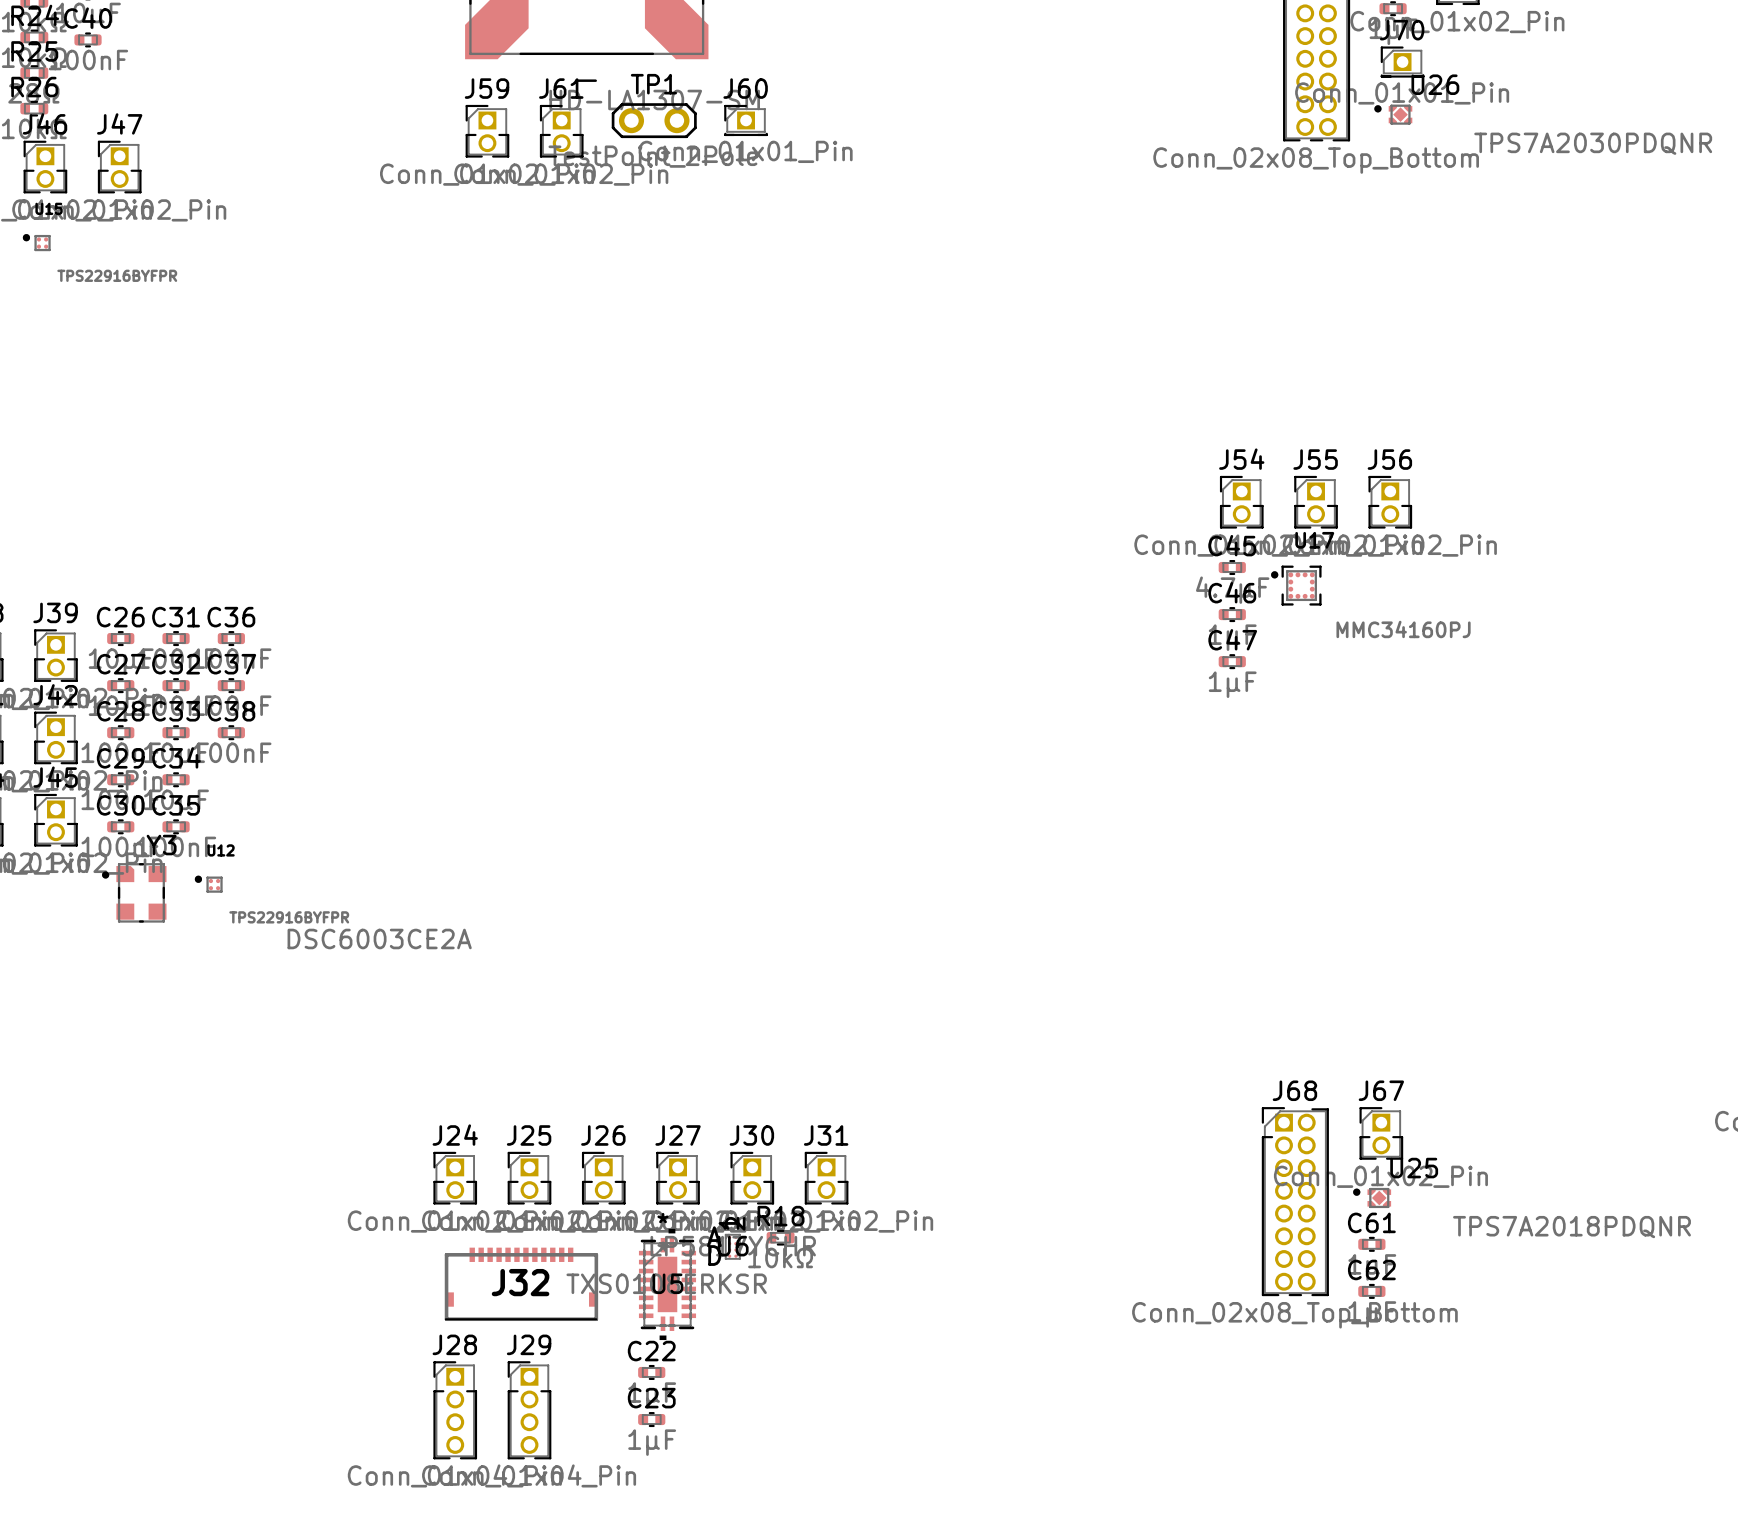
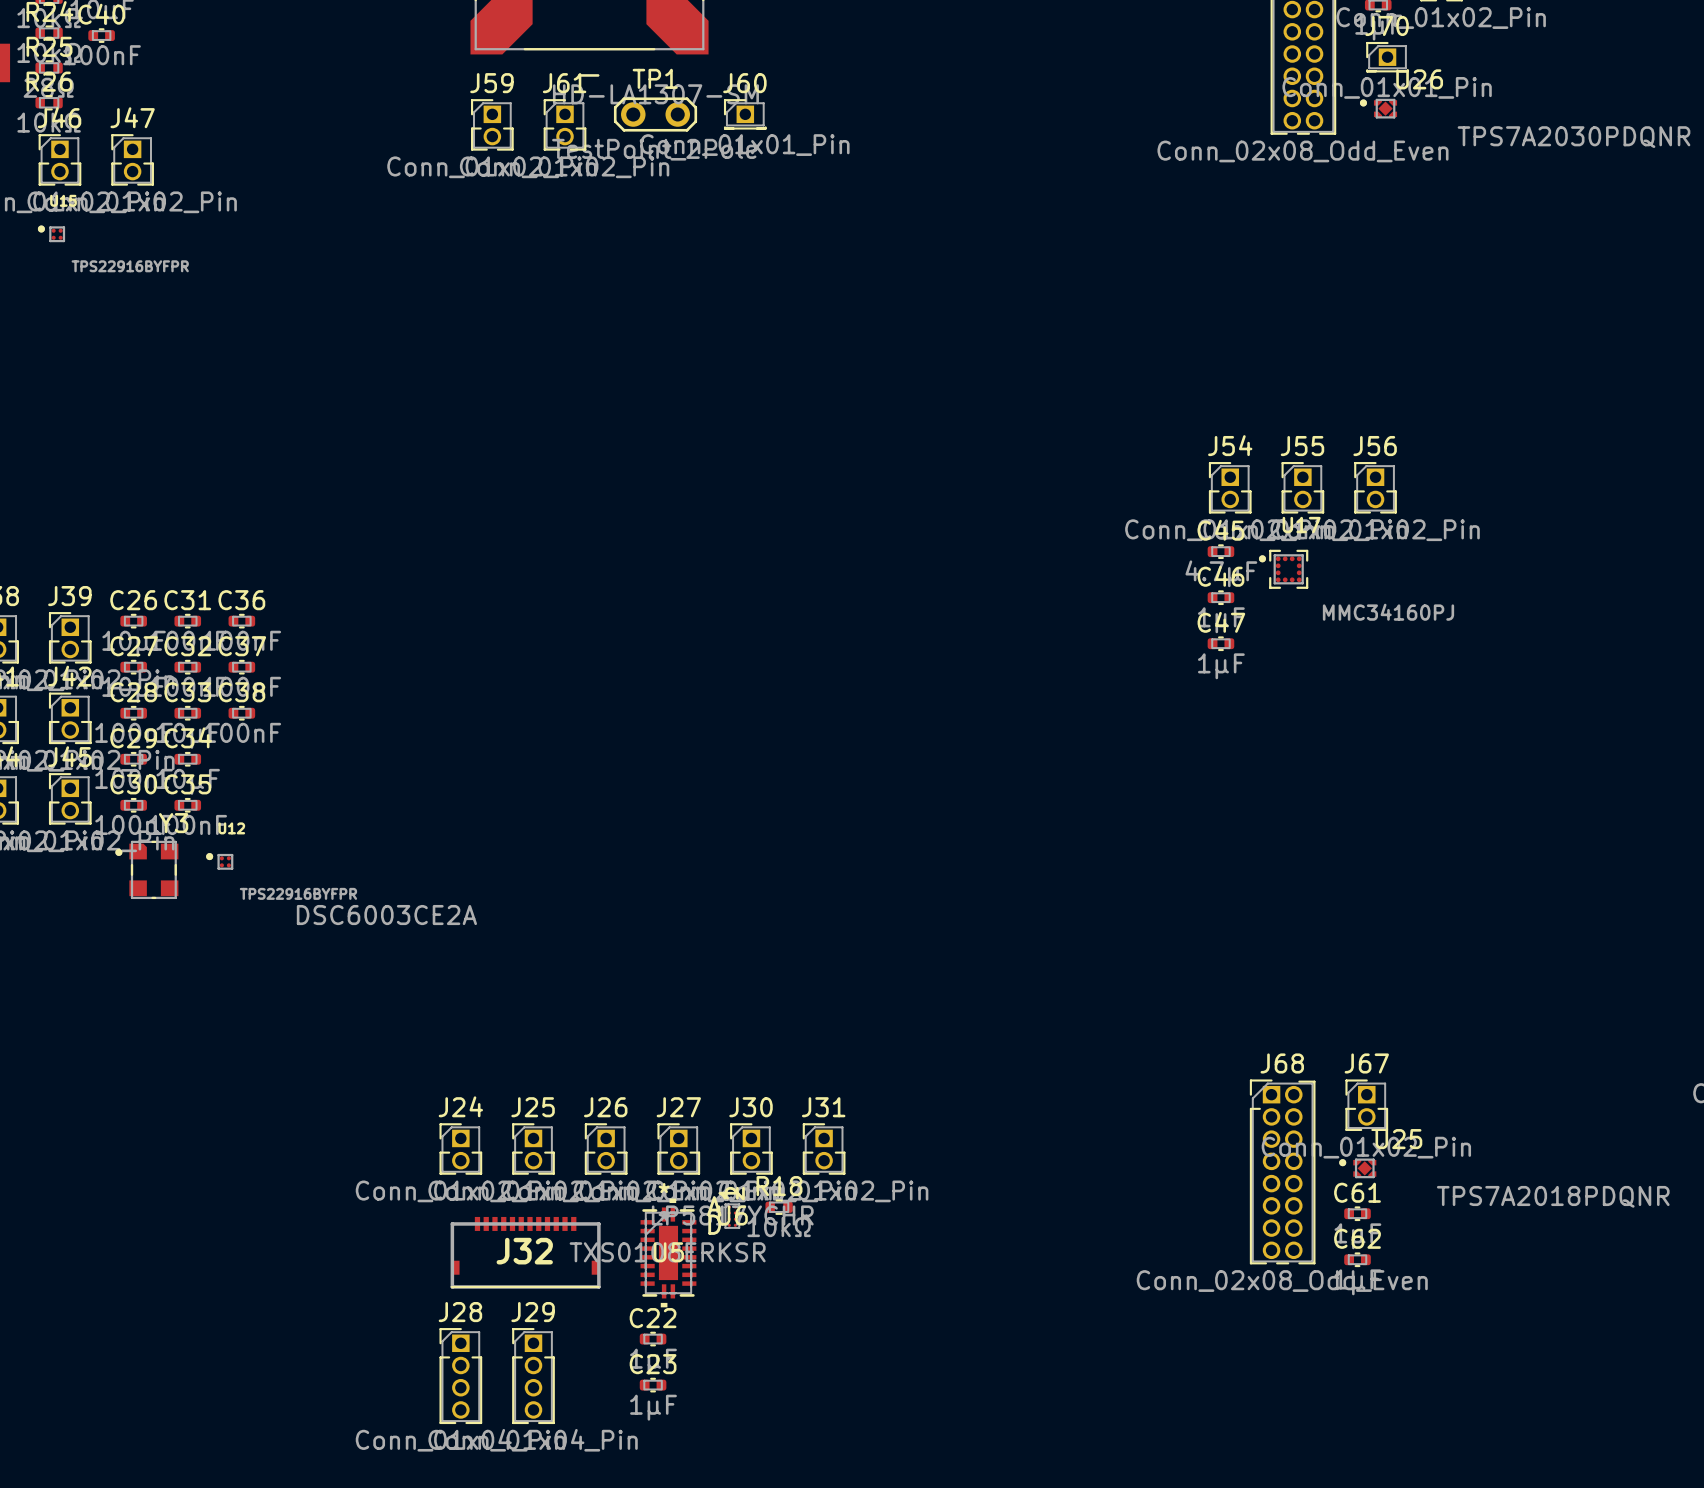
part value: Conn_02x08_Top_Bottom (1316, 160) -> Conn_02x08_Odd_Even (1302, 151)
J68 value: Conn_02x08_Top_Bottom (1294, 1315) -> Conn_02x08_Odd_Even (1282, 1281)

